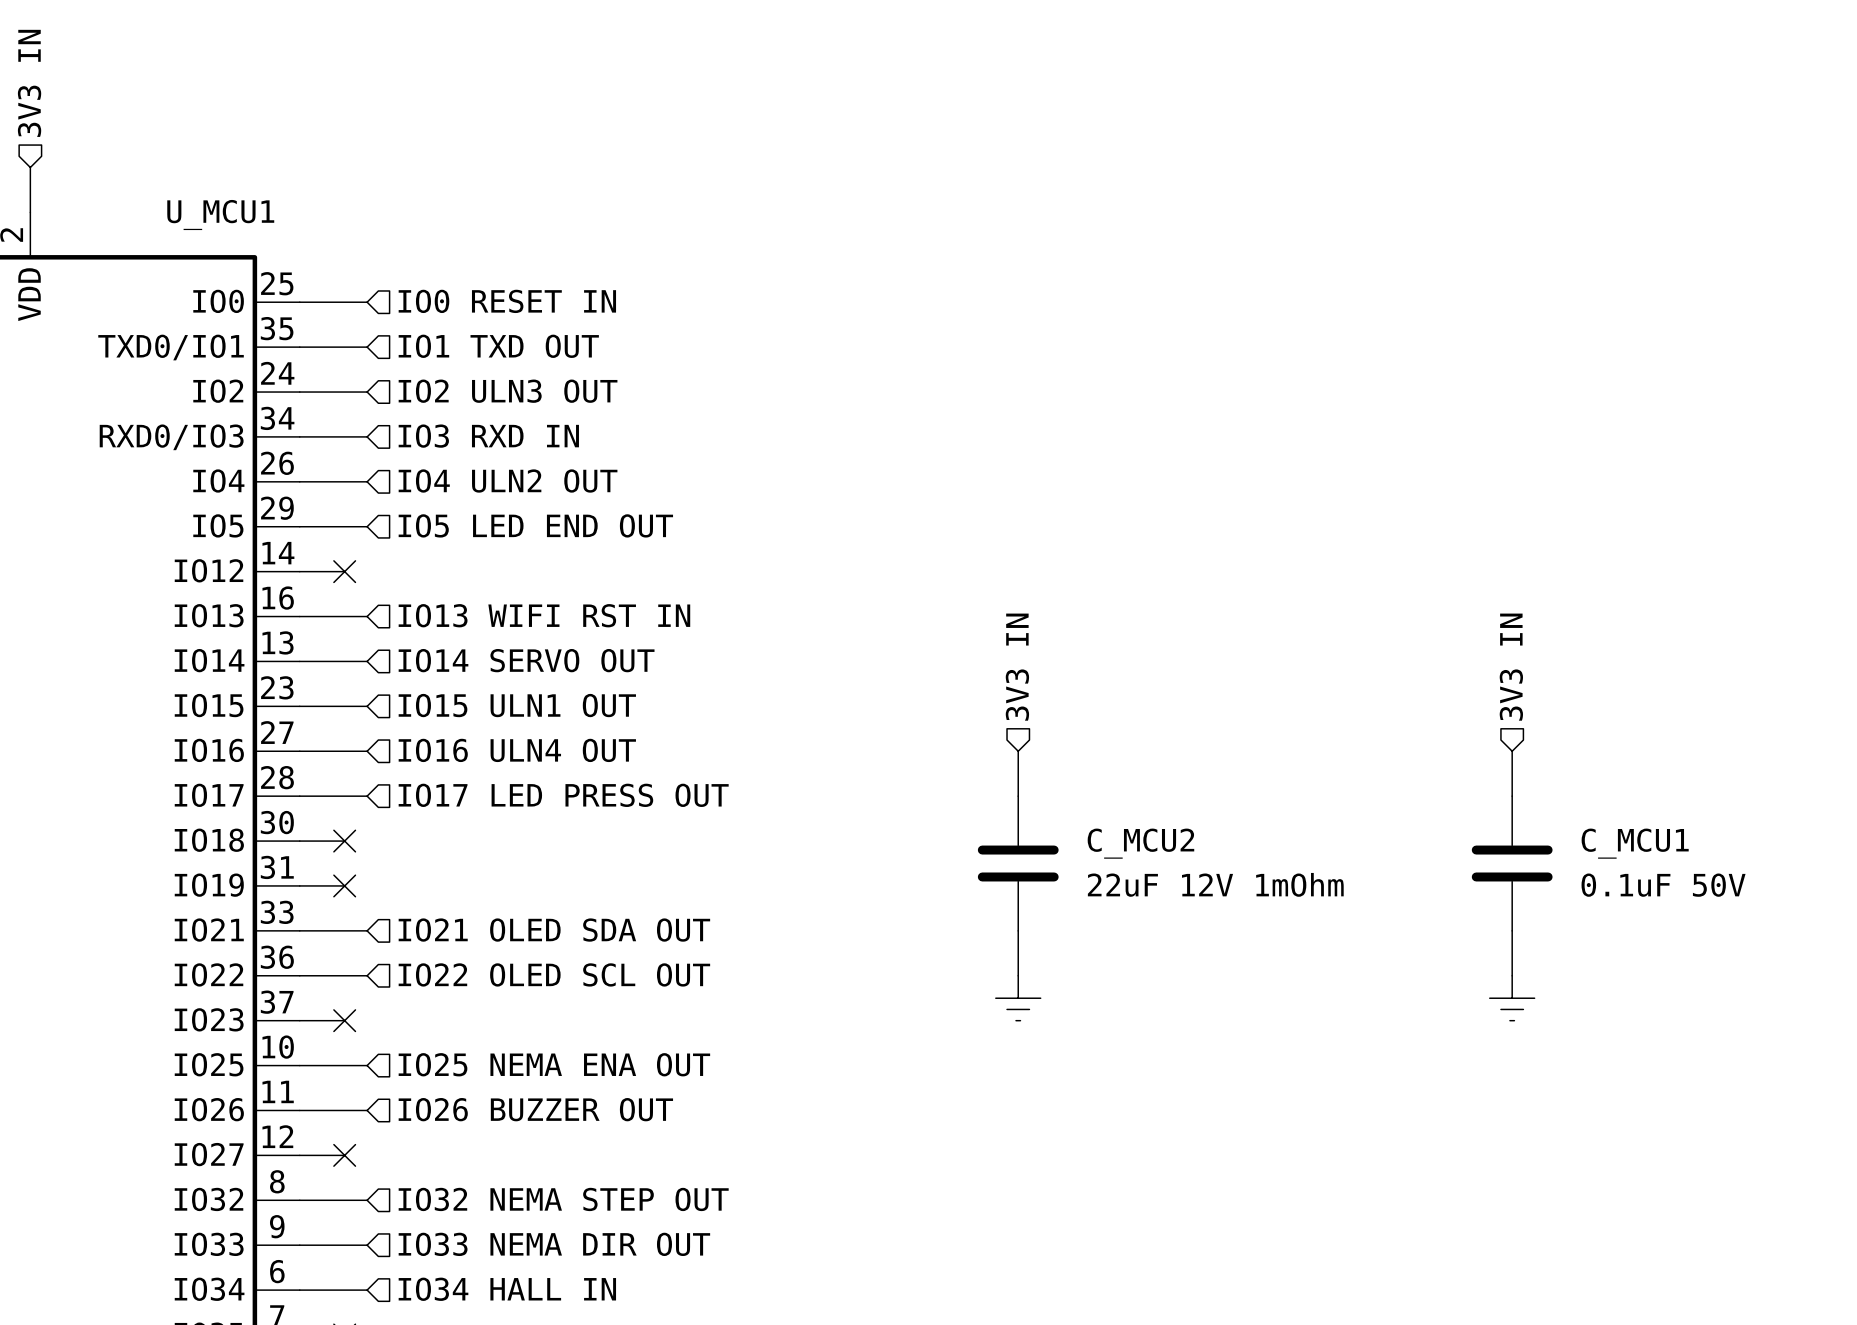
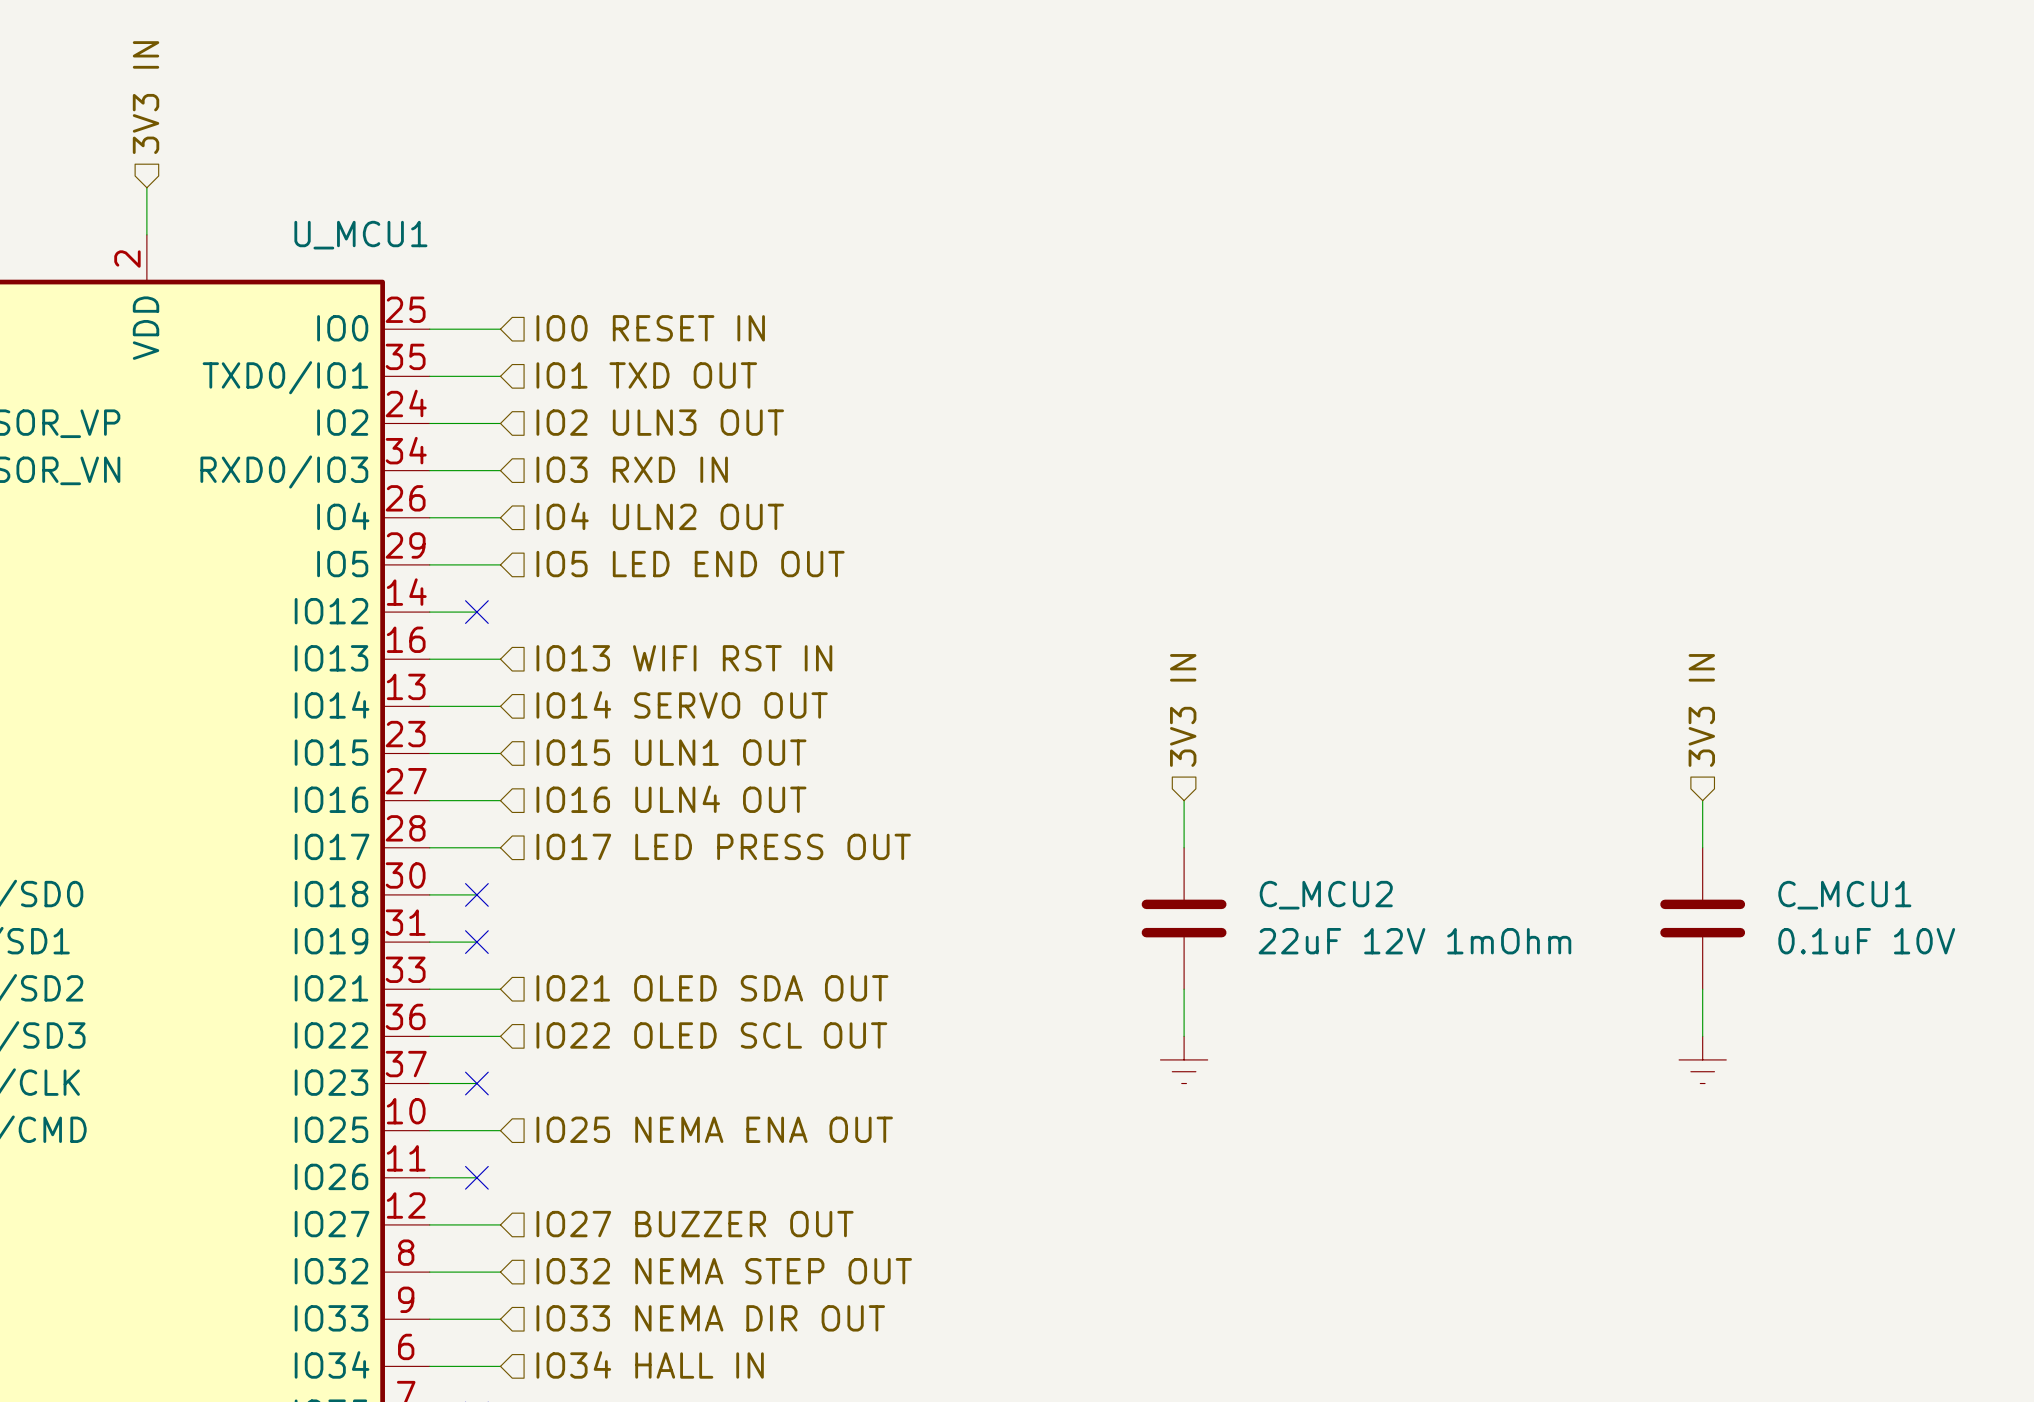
C_MCU1 value: 0.1uF 50V (1663, 885) -> 0.1uF 10V (1866, 941)
hierarchical label: IO26 BUZZER OUT (535, 1109) -> IO27 BUZZER OUT (695, 1224)
wire: (344, 1110) (367, 1110) -> (476, 1224) (500, 1224)
no-connect mark position: (344, 1155) -> (476, 1177)

